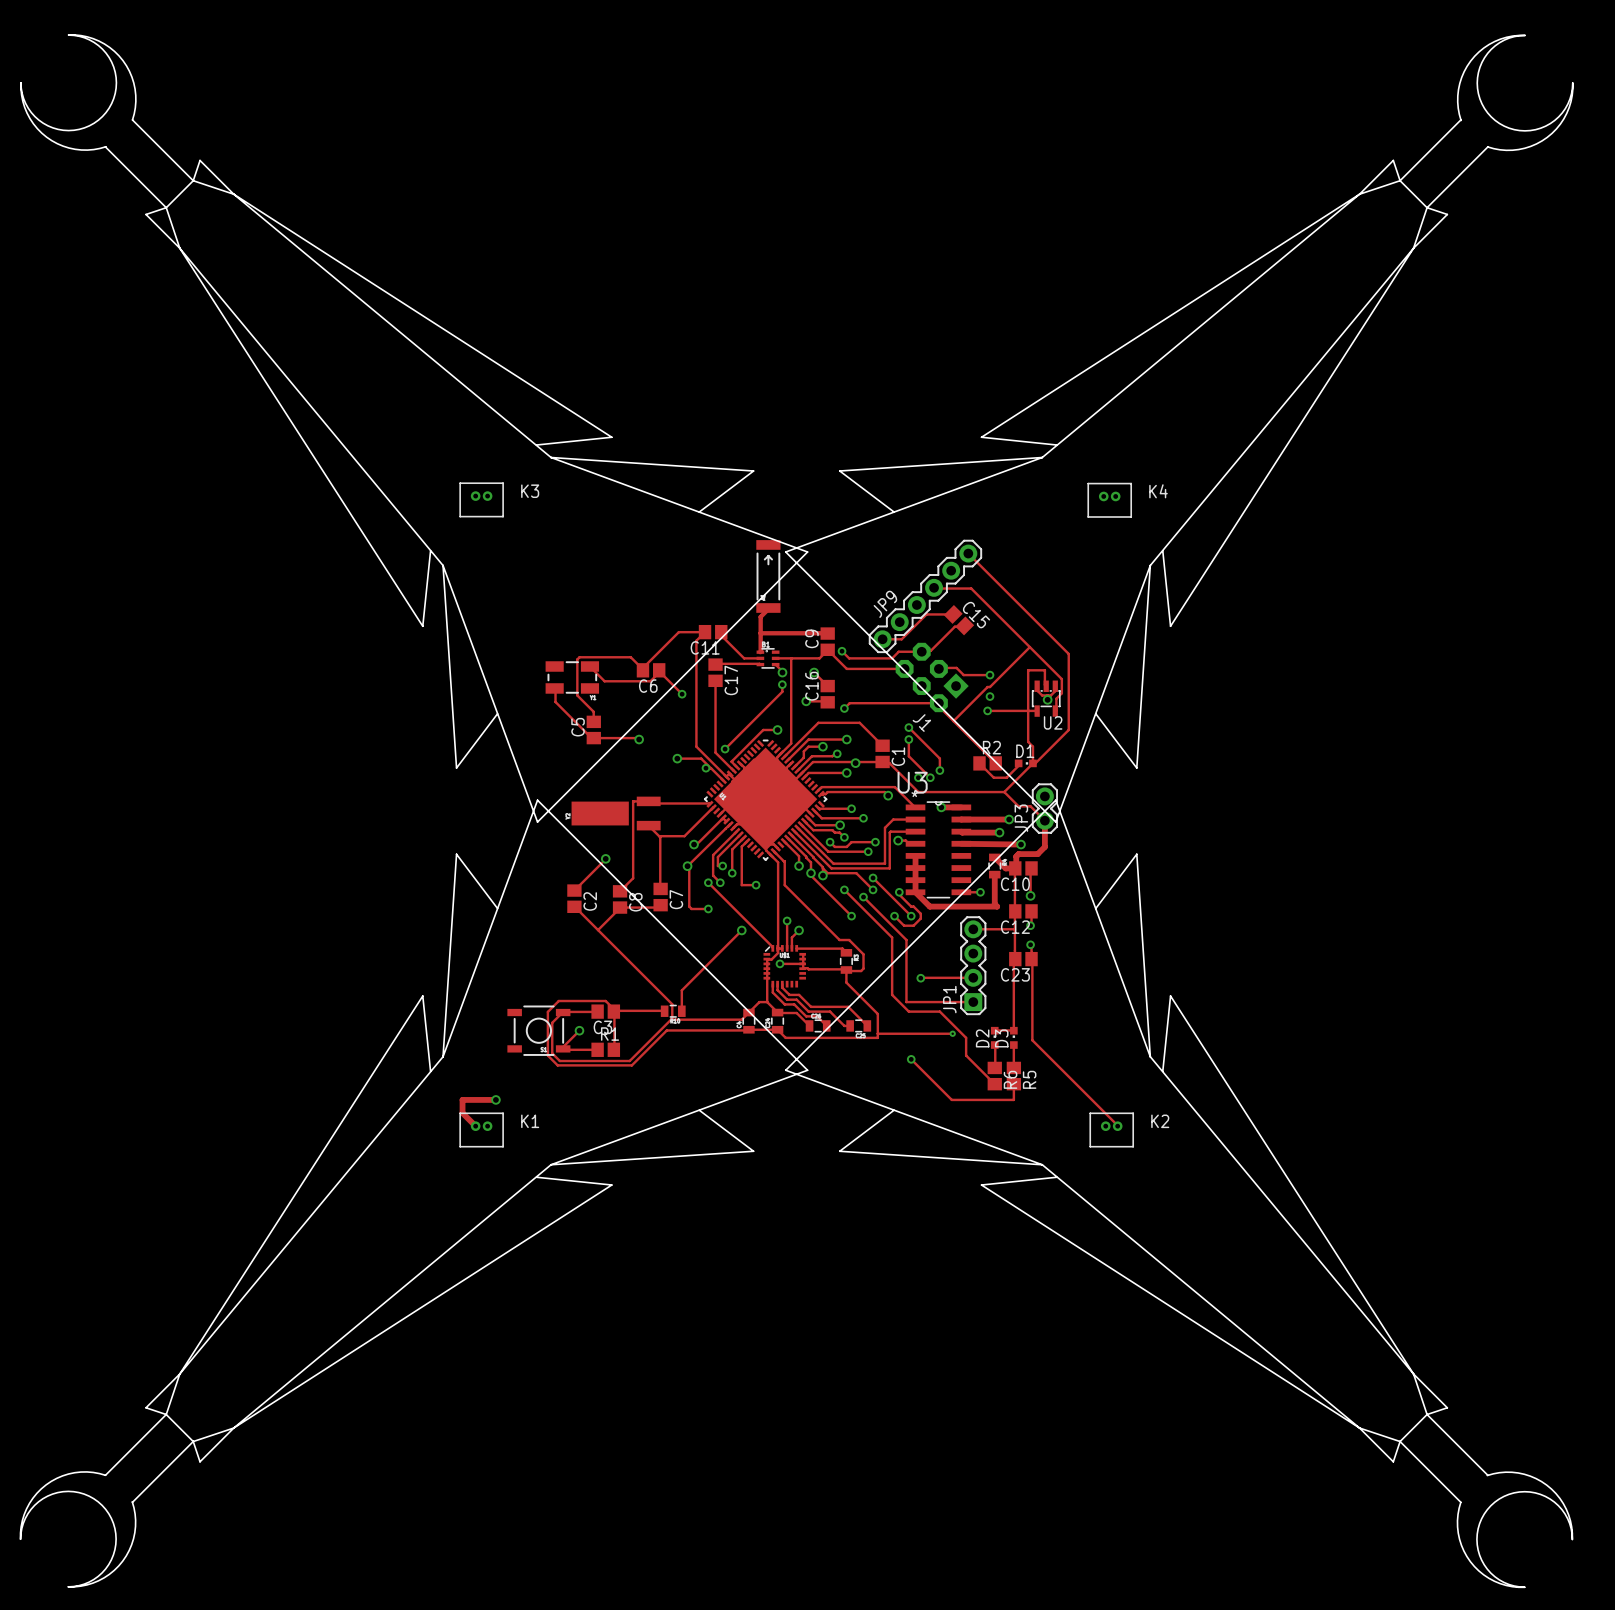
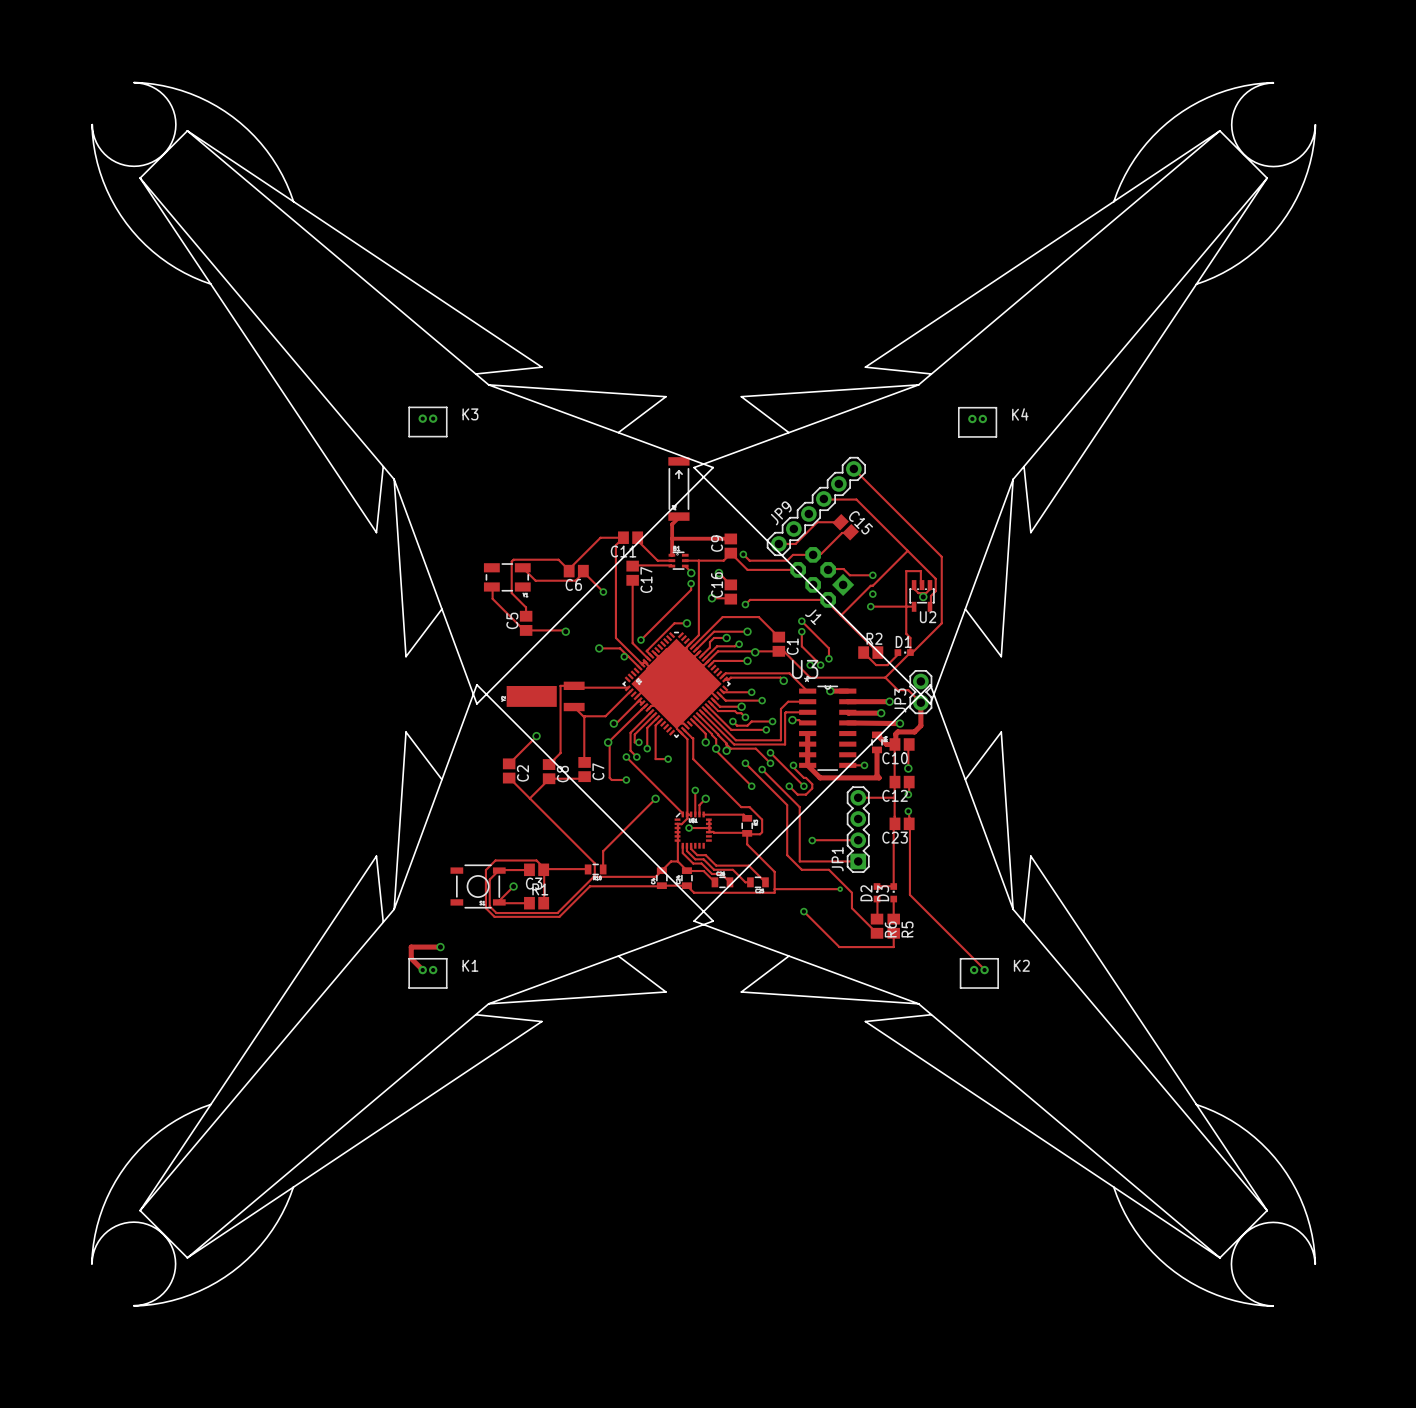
drawing: [19, 34, 1574, 1588] -> none
drawing: none -> [91, 81, 1317, 1307]

